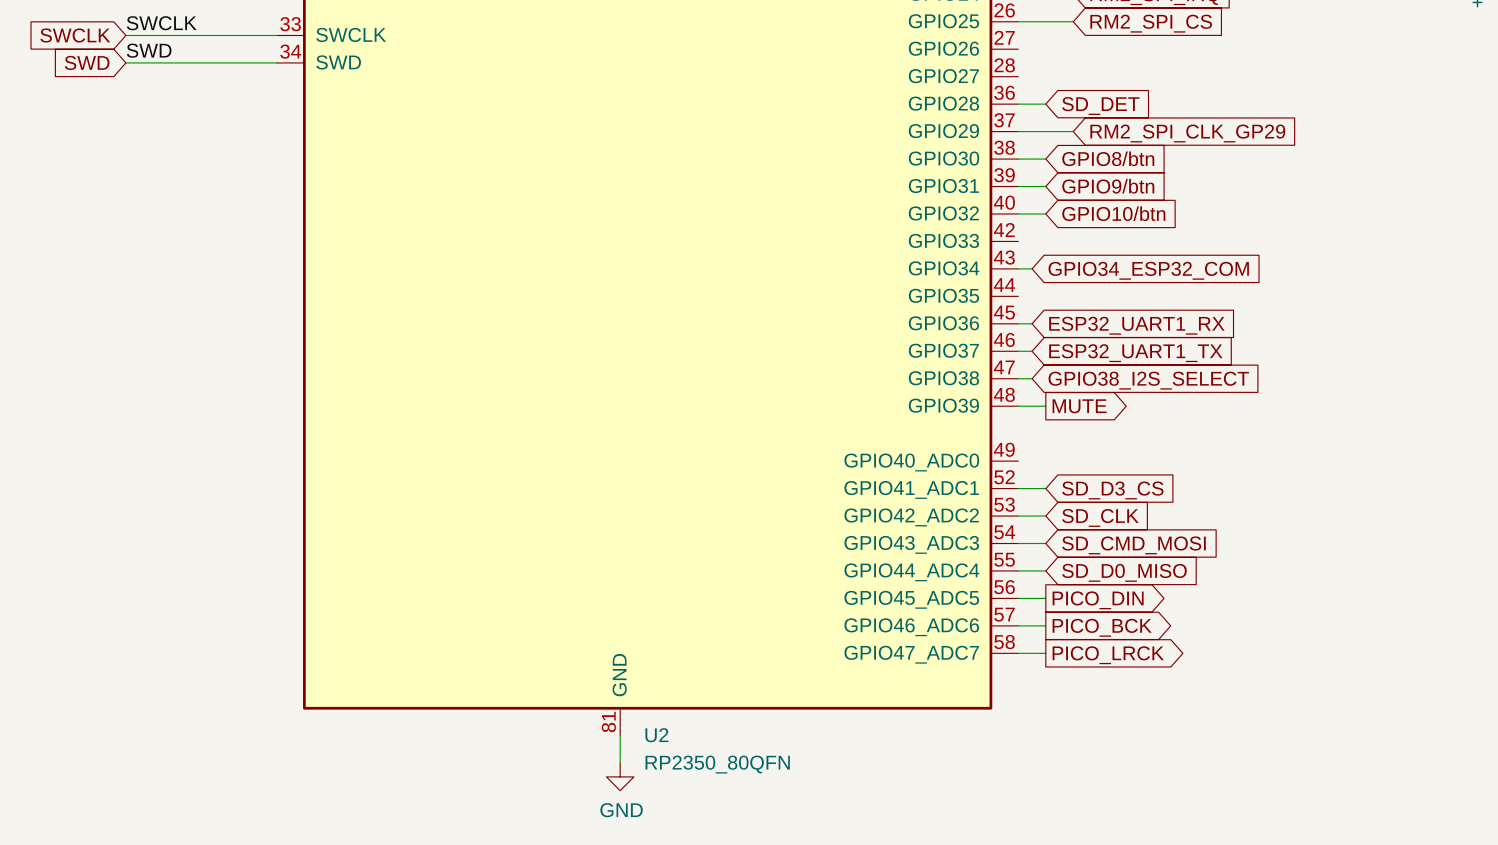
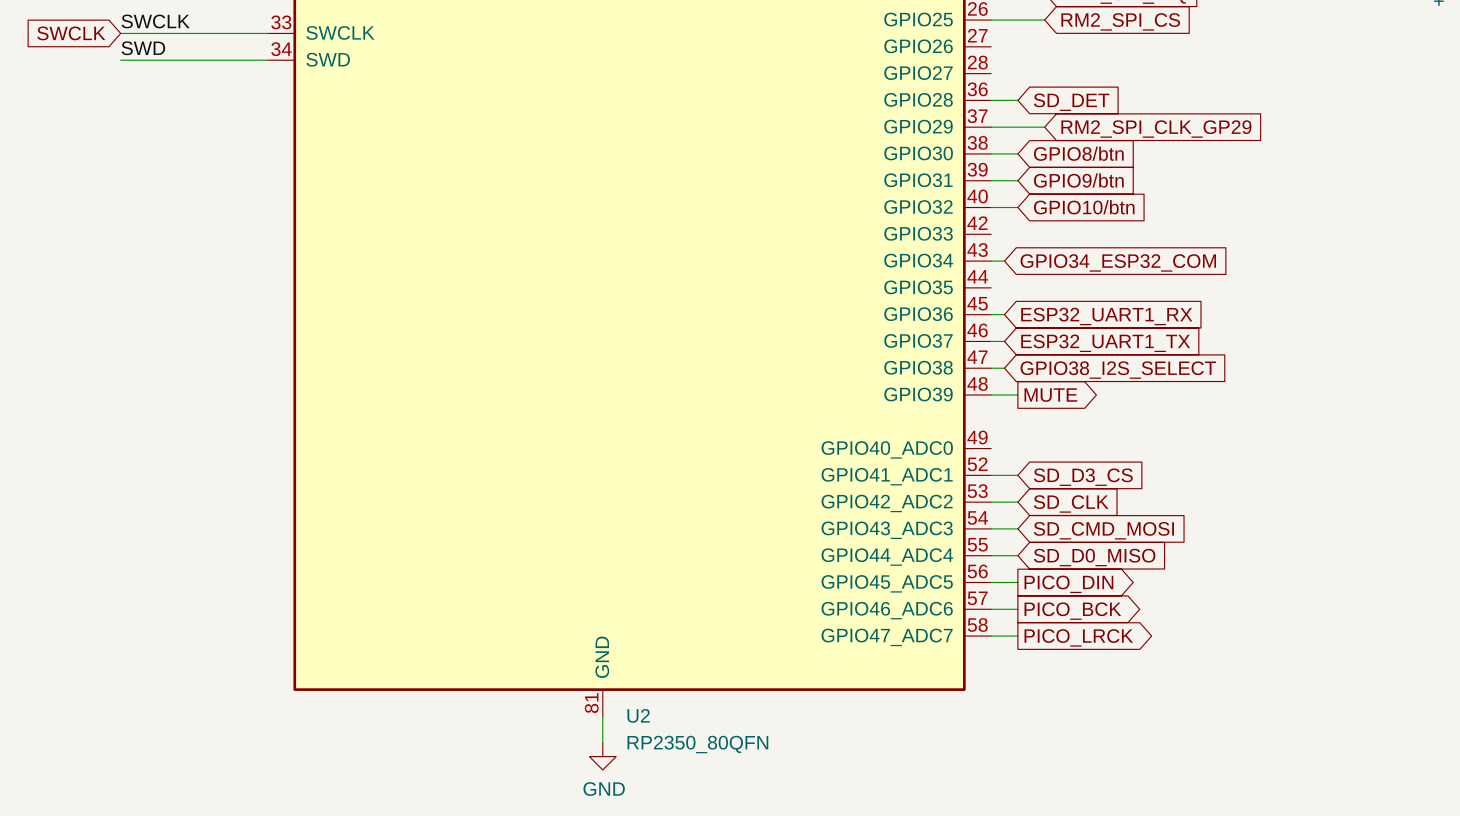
global label: SWD (87, 62) -> none

